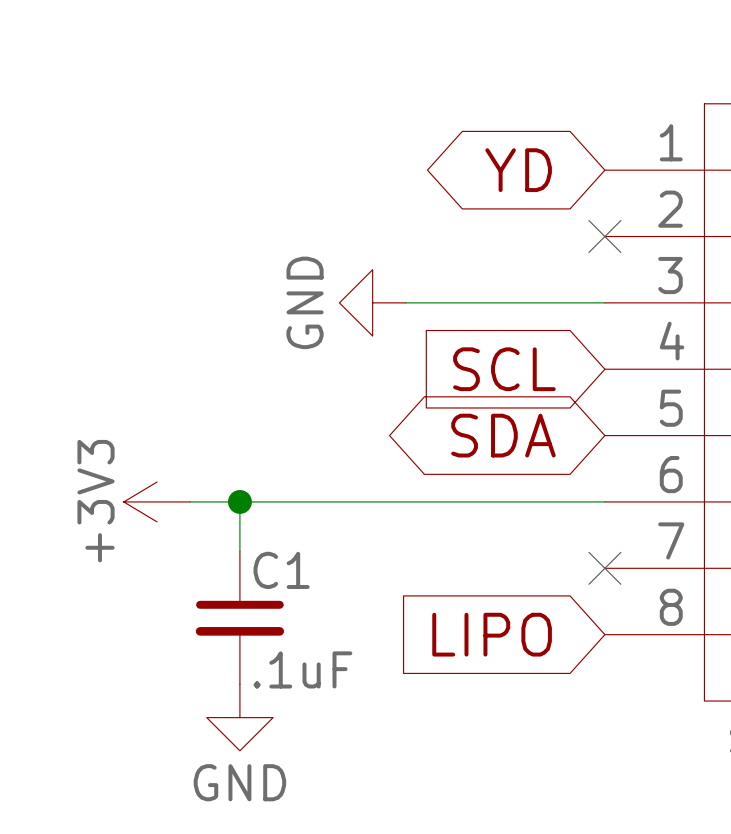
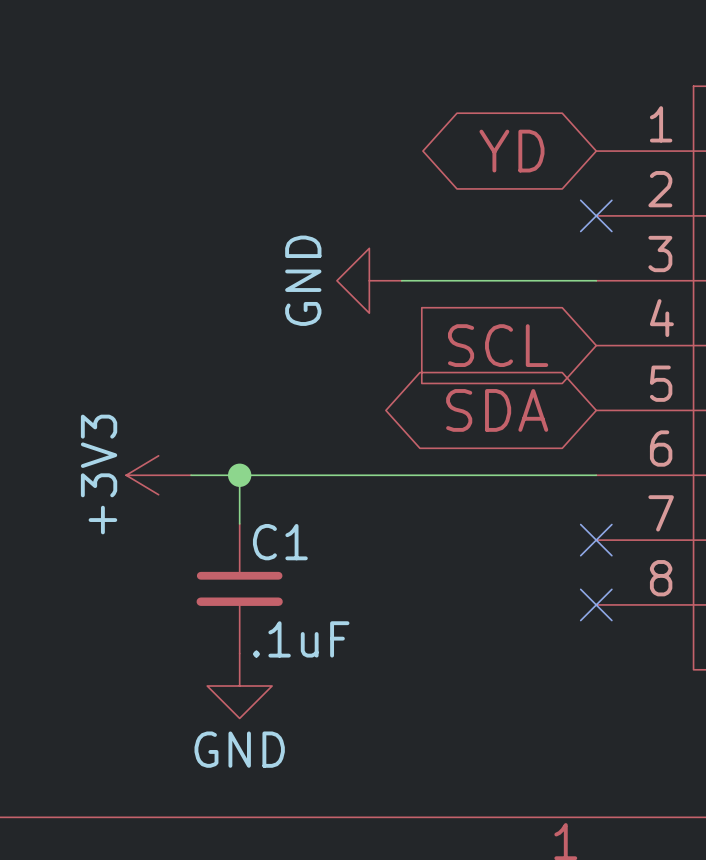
global label: LIPO (492, 634) -> none
no-connect mark: none -> (596, 604)

